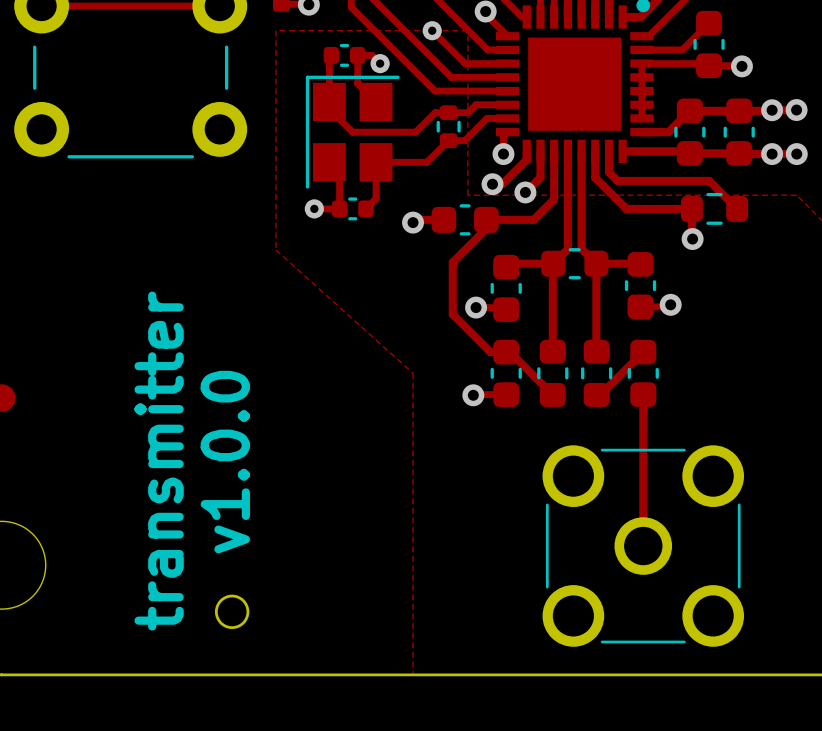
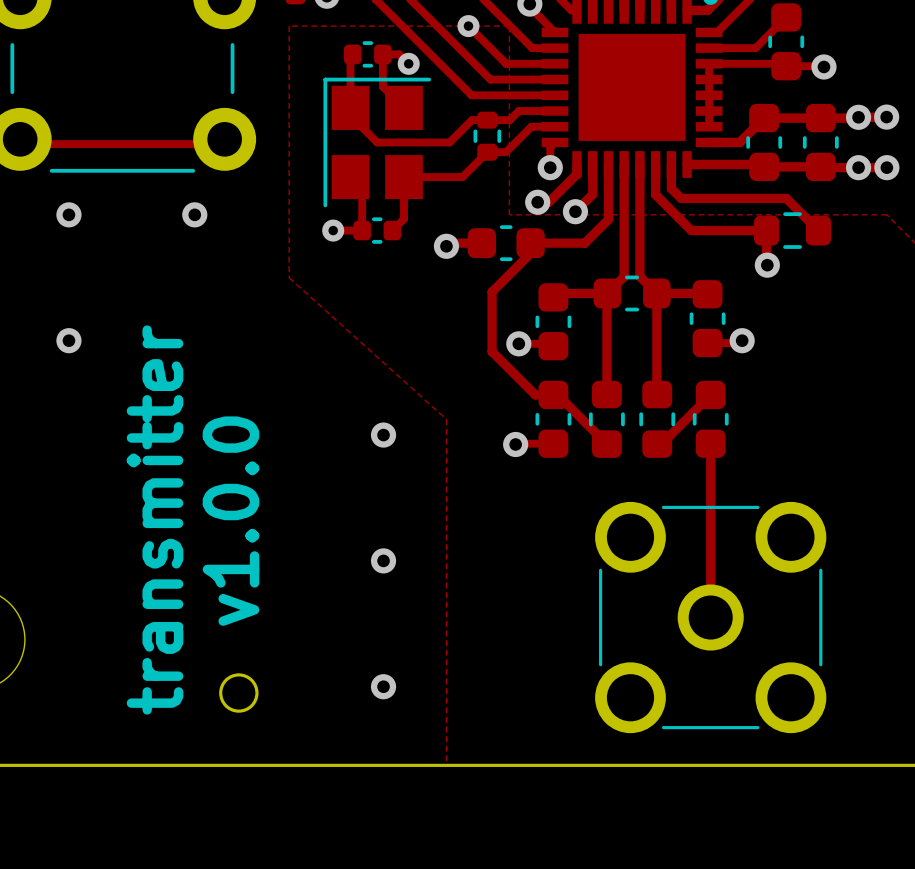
track: none -> (20, 144) (224, 144)
via: none -> (68, 214)
via: none -> (194, 214)
via: none -> (68, 340)
via: none -> (383, 435)
via: none -> (383, 560)
via: none -> (383, 686)

